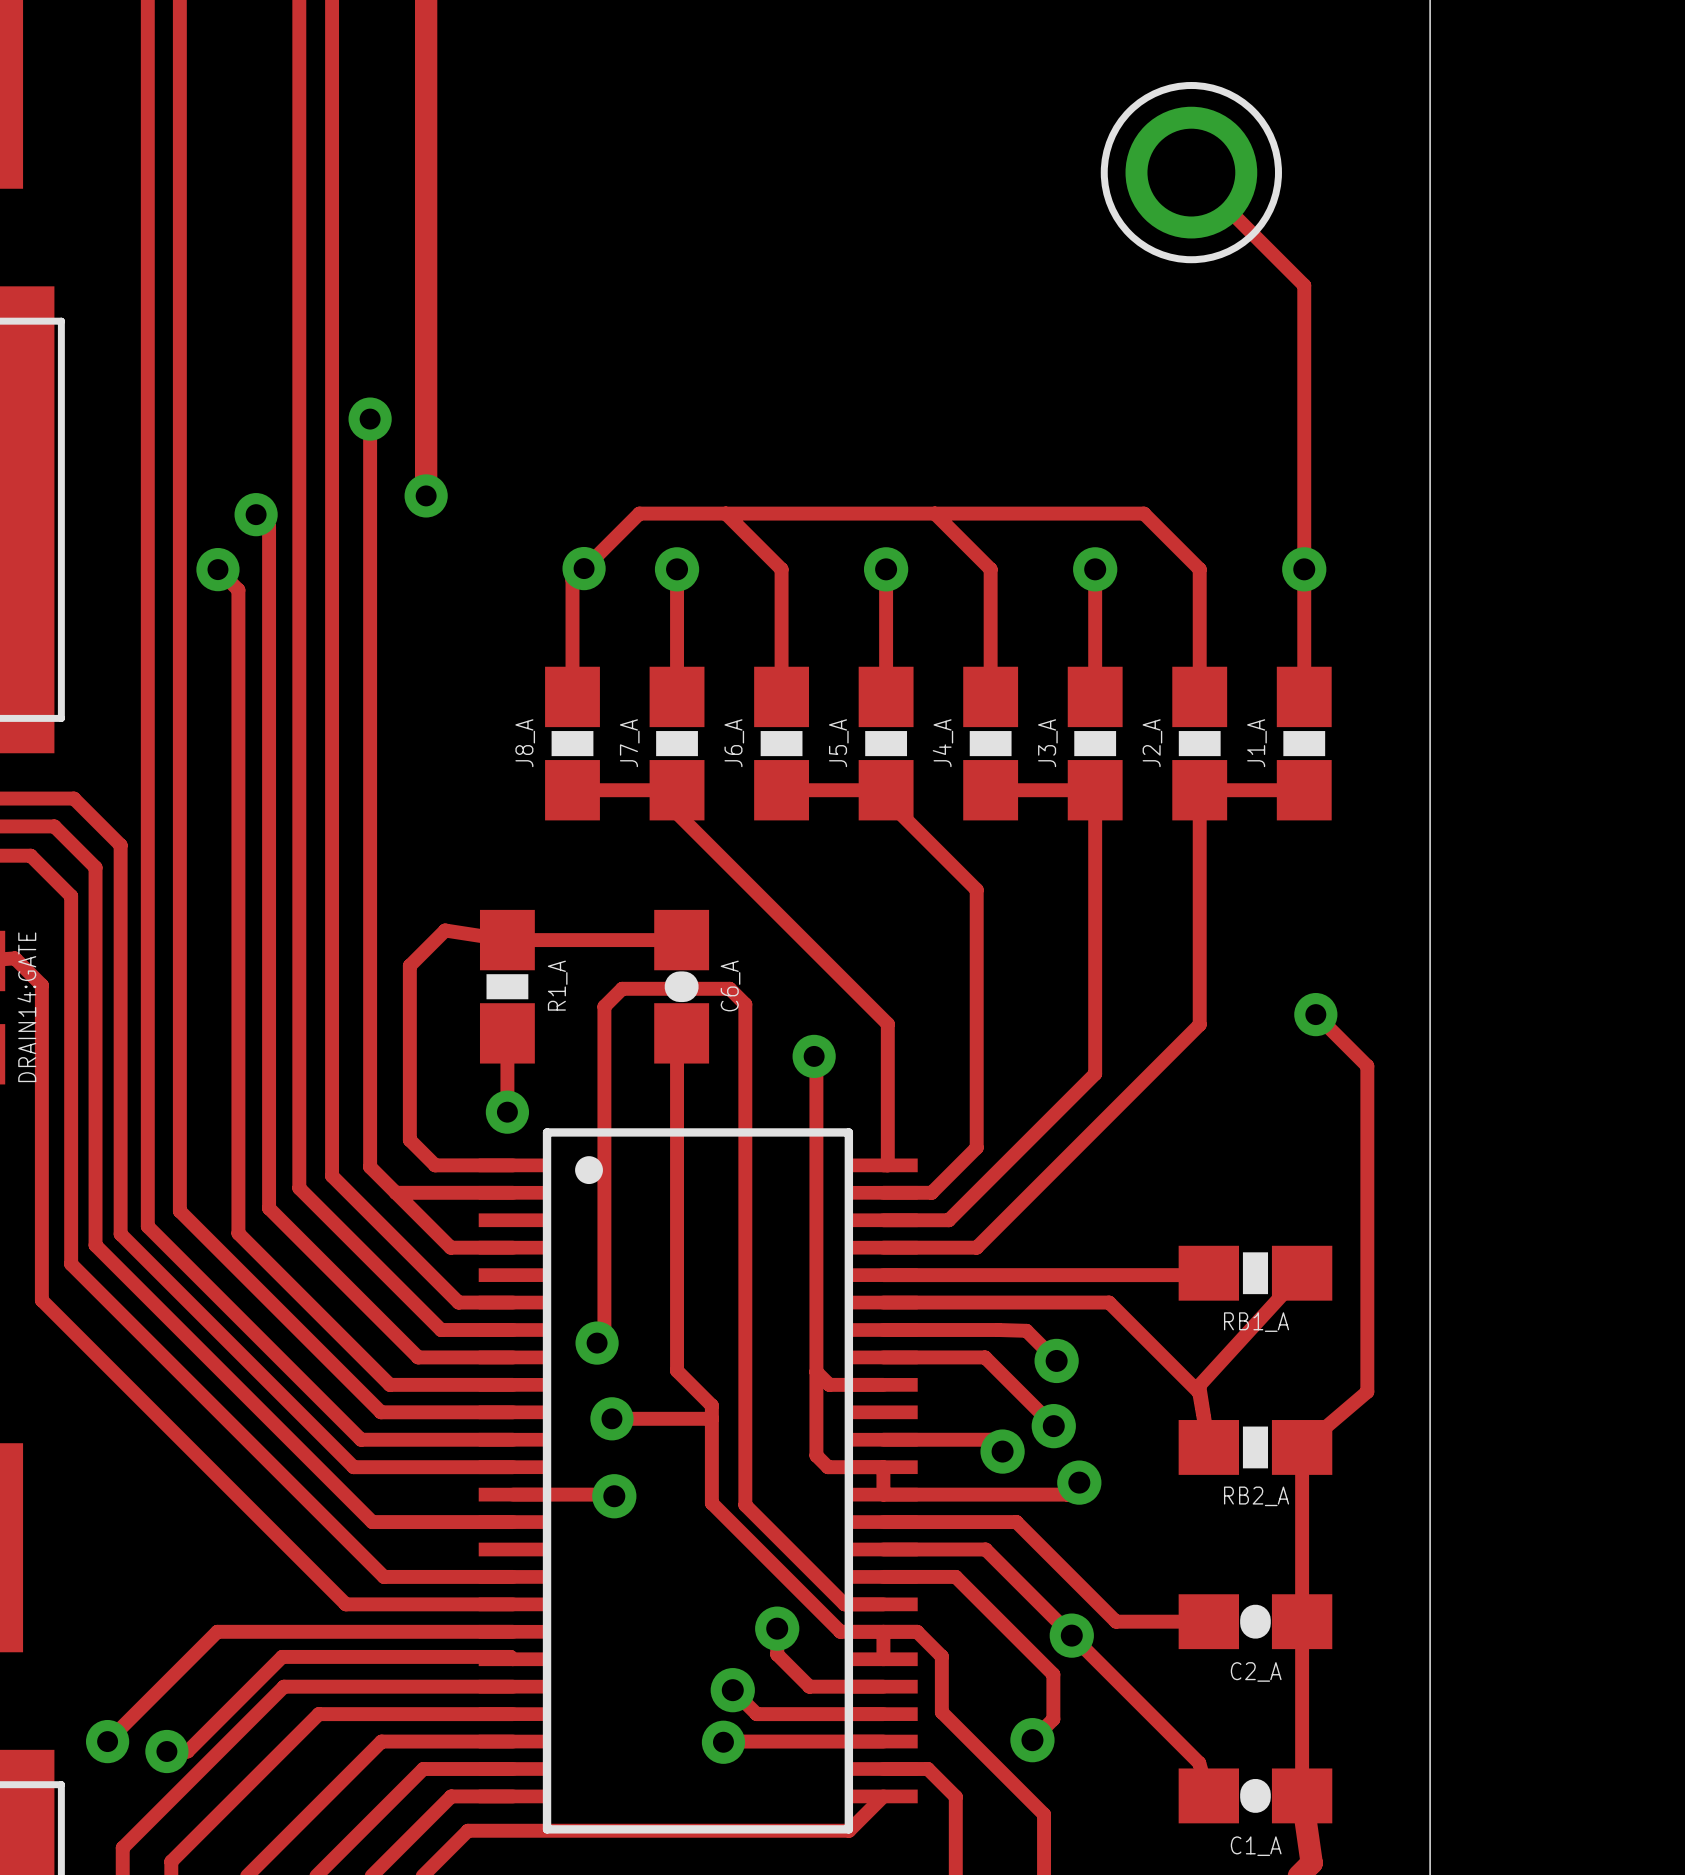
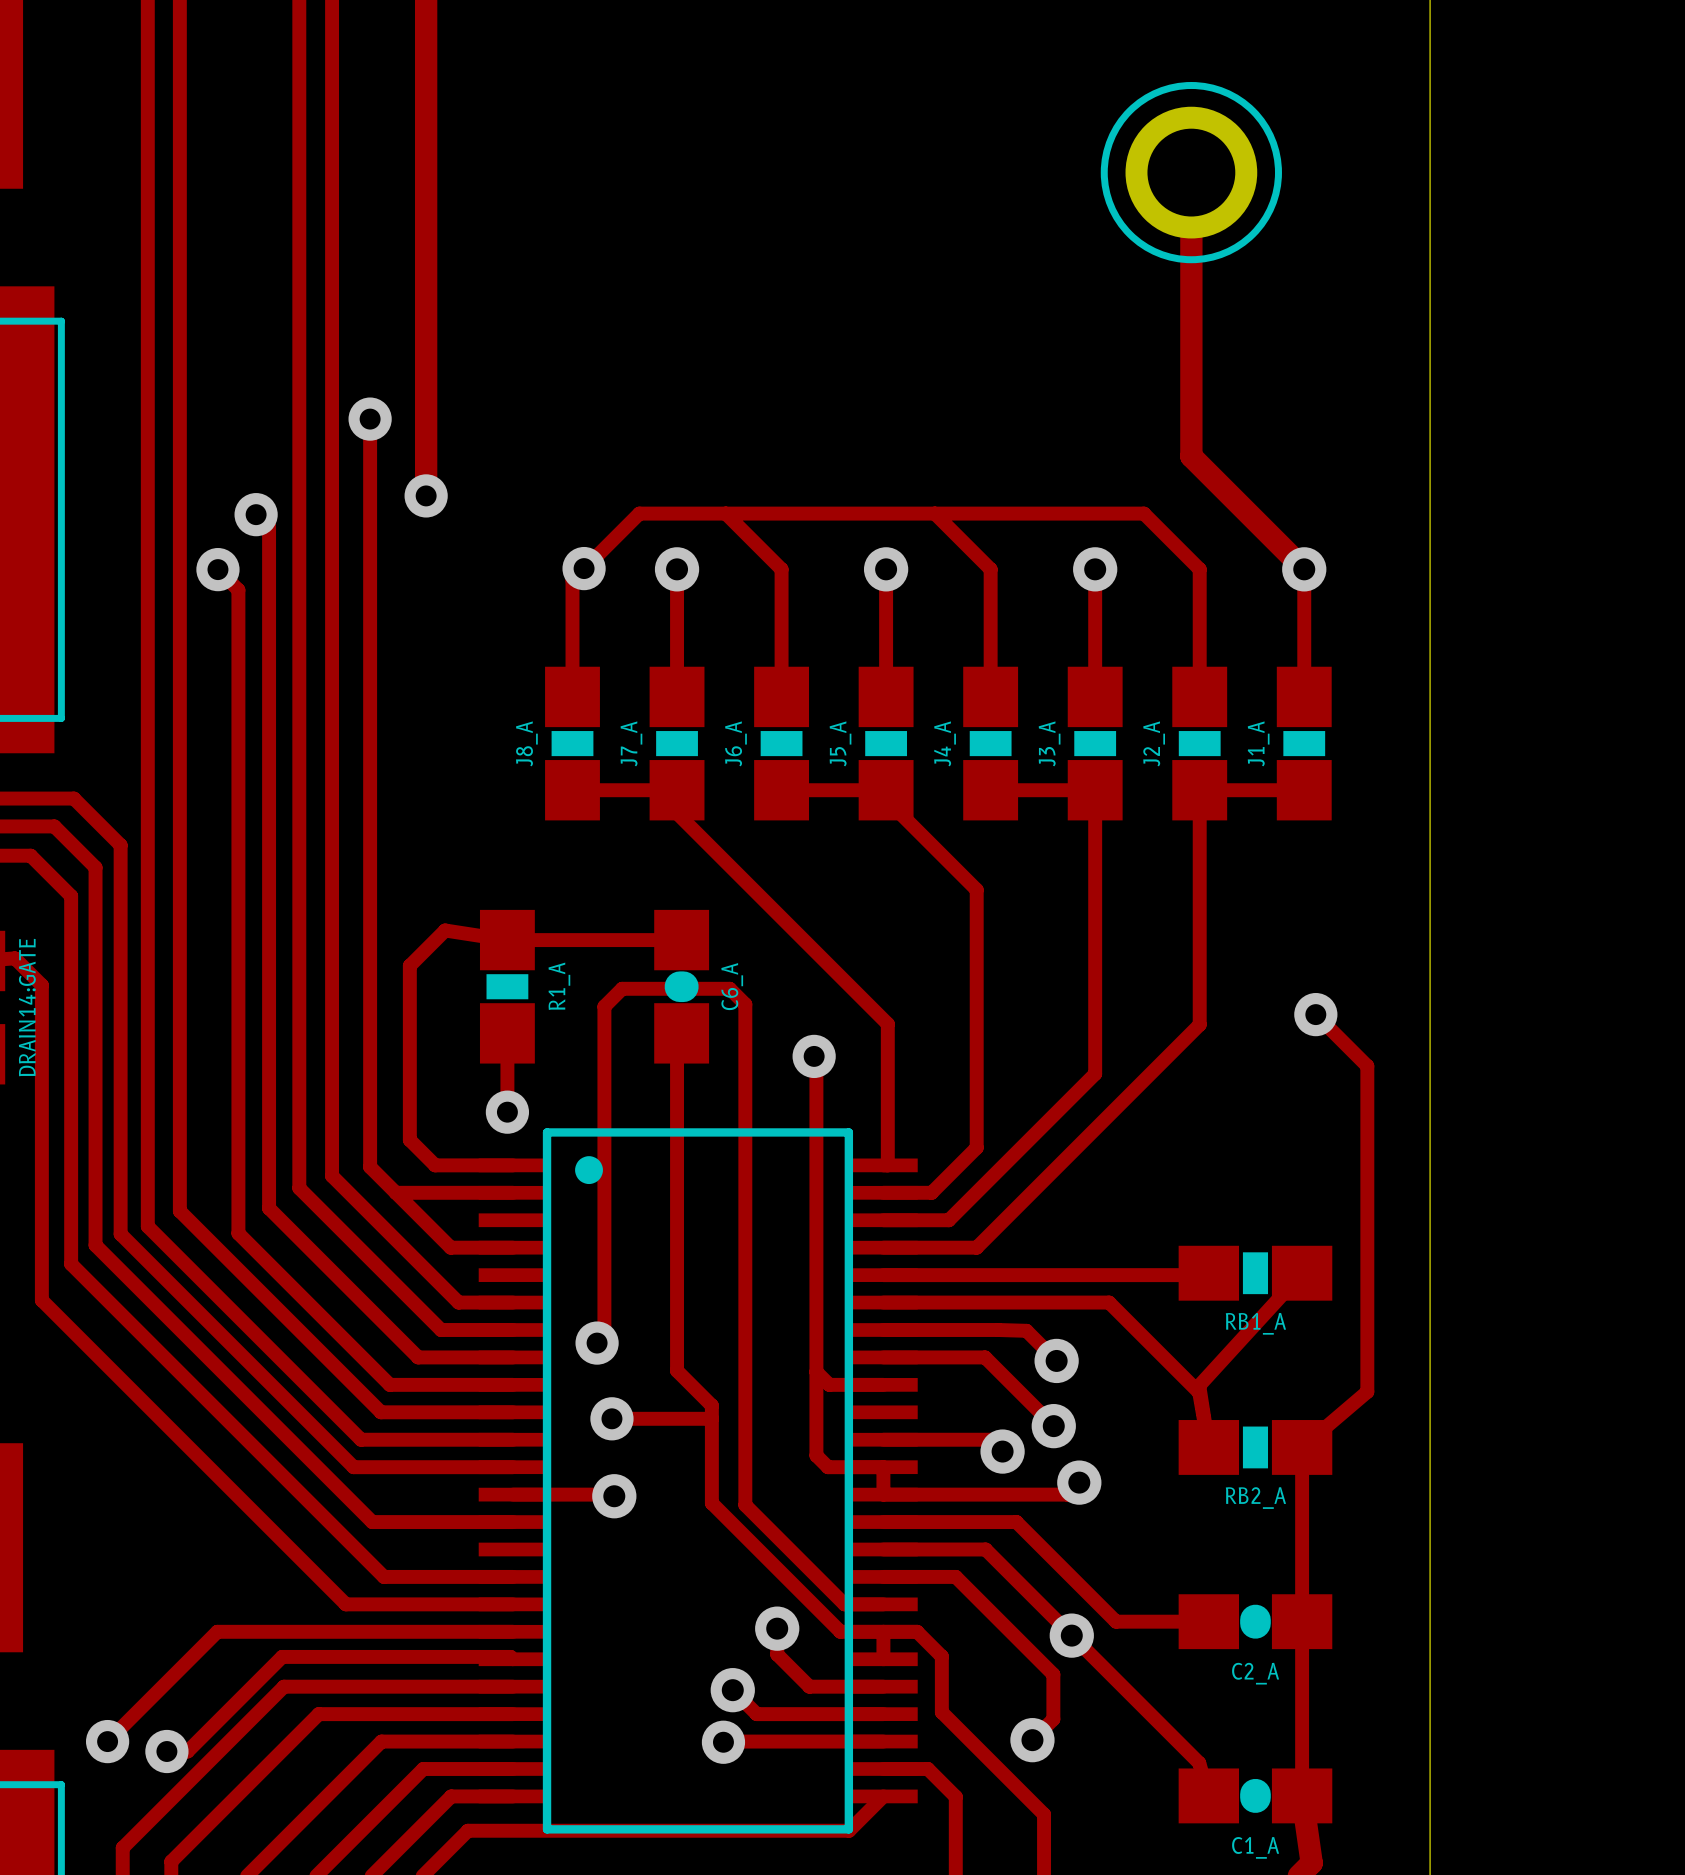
track: (1191, 172) (1304, 285) (1304, 569) -> (1191, 172) (1191, 456) (1304, 569)

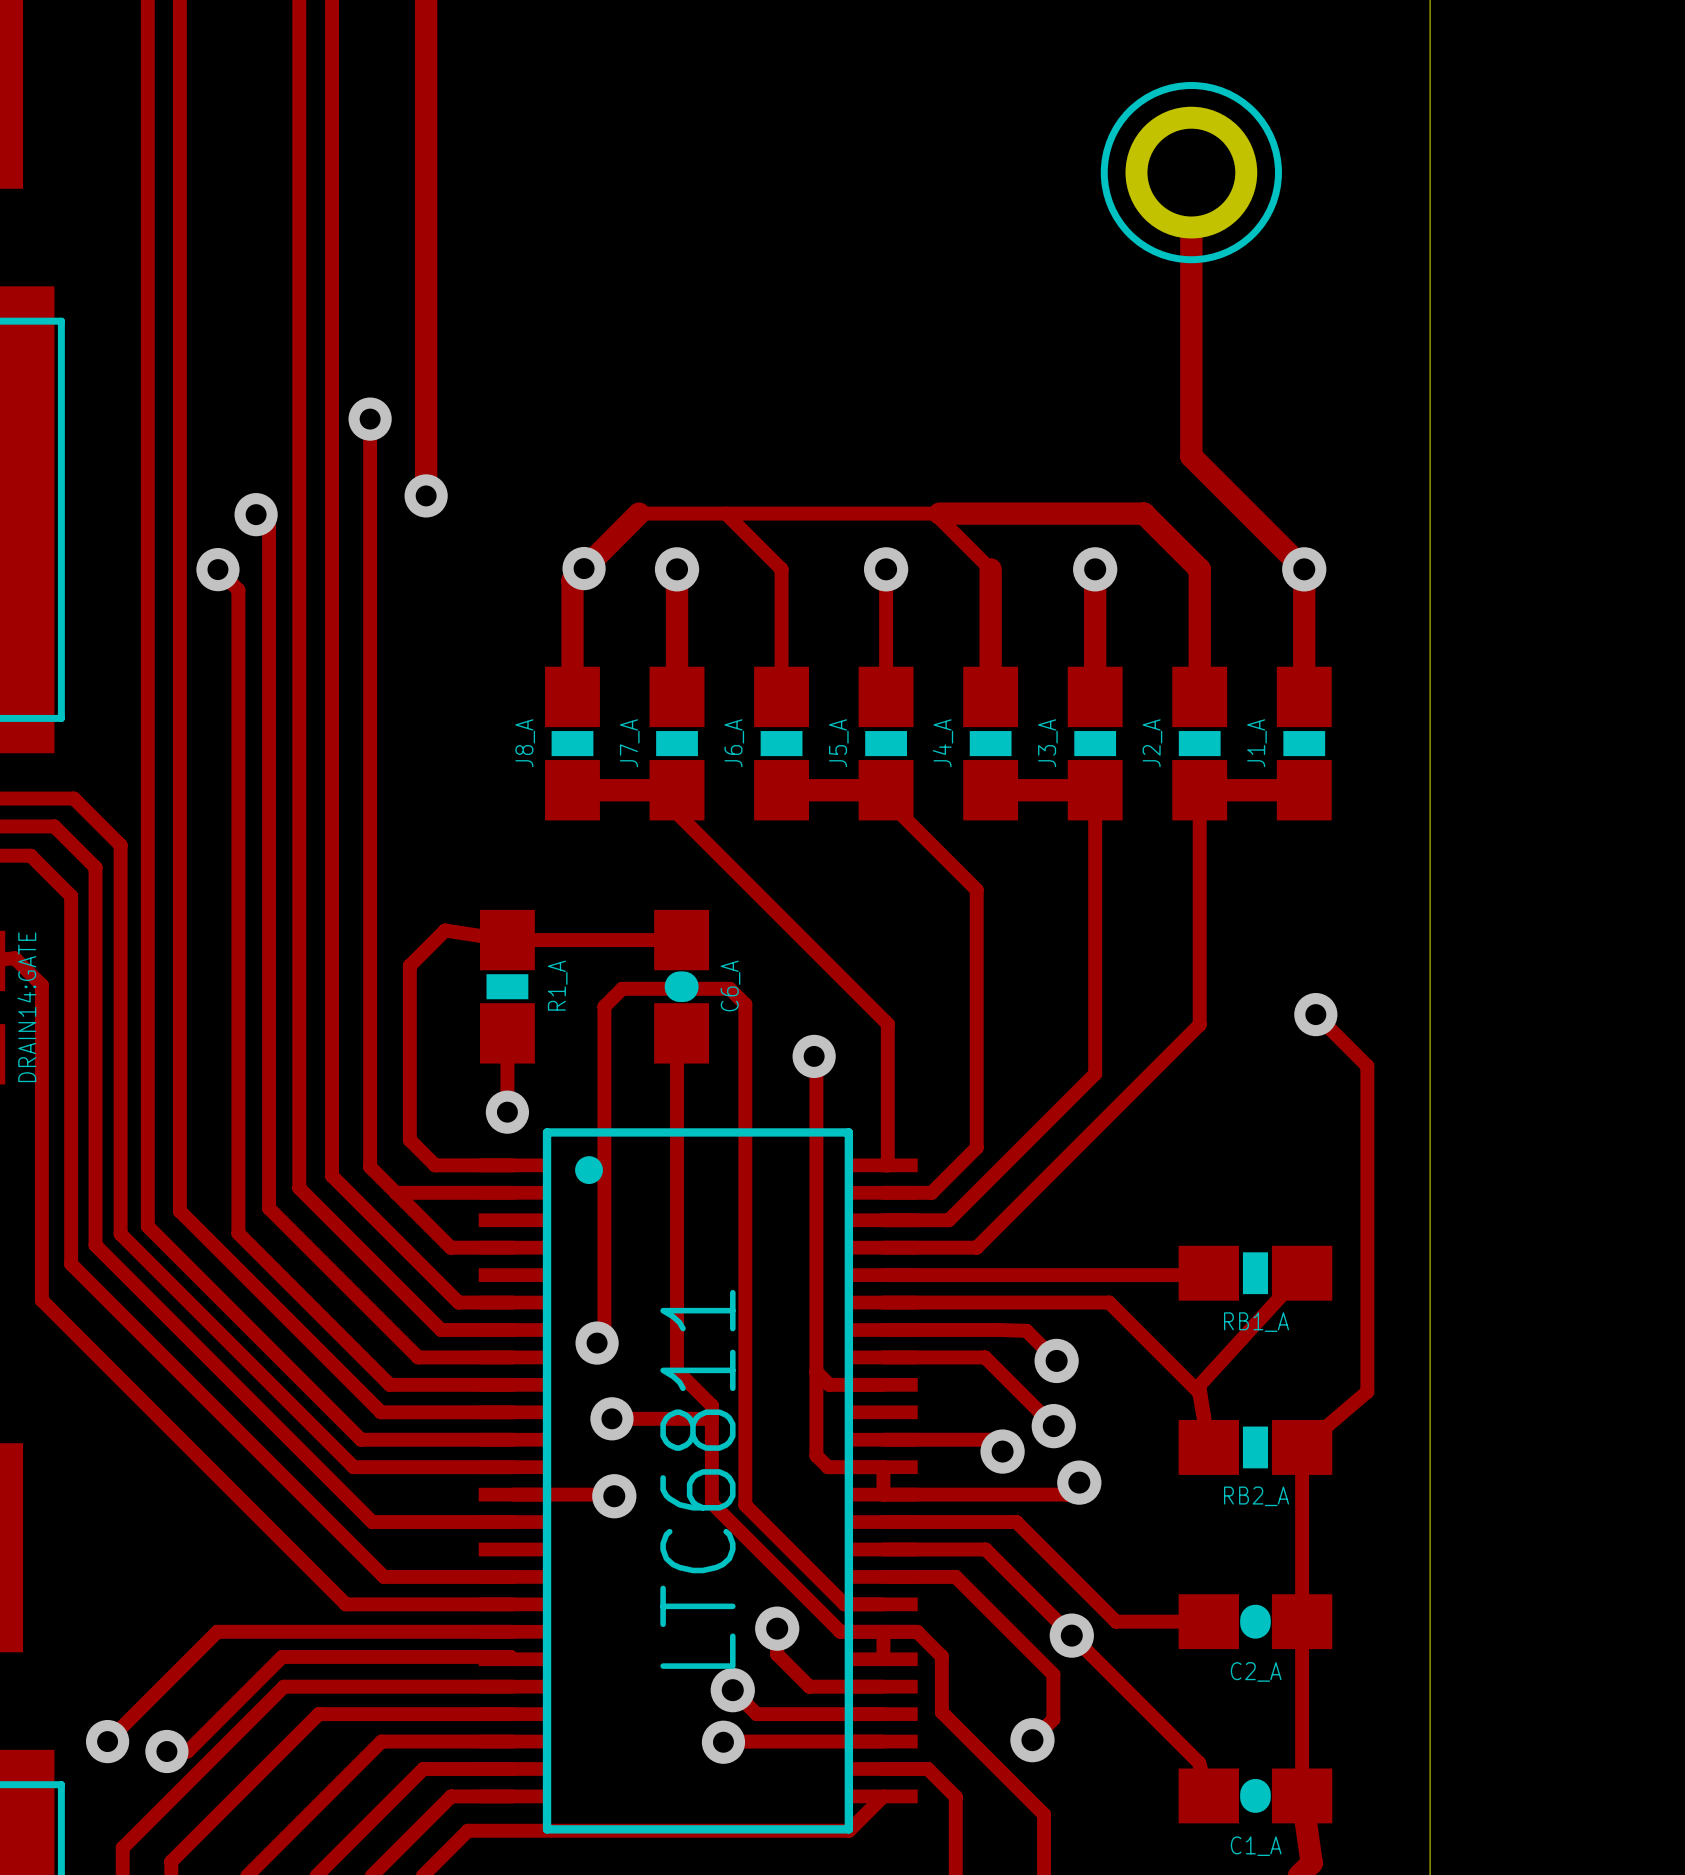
track width: thin (939, 513) (1143, 513) (1199, 569) (1199, 694) -> thick (939, 513) (1143, 513) (1199, 569) (1199, 694)
track width: thin (677, 569) (677, 696) -> thick (677, 569) (677, 696)
track width: thin (990, 569) (990, 696) -> thick (990, 569) (990, 696)
track width: thin (1095, 569) (1095, 694) -> thick (1095, 569) (1095, 694)
track width: thin (1304, 569) (1304, 696) -> thick (1304, 569) (1304, 696)
track width: thin (572, 580) (572, 696) -> thick (572, 580) (572, 696)
track width: thin (572, 790) (660, 790) -> thick (572, 790) (660, 790)
track width: thin (781, 790) (886, 790) -> thick (781, 790) (886, 790)
track width: thin (990, 790) (1095, 790) -> thick (990, 790) (1095, 790)
track width: thin (1199, 790) (1287, 790) -> thick (1199, 790) (1287, 790)
part text: none -> LTC6811 (697, 1479)

